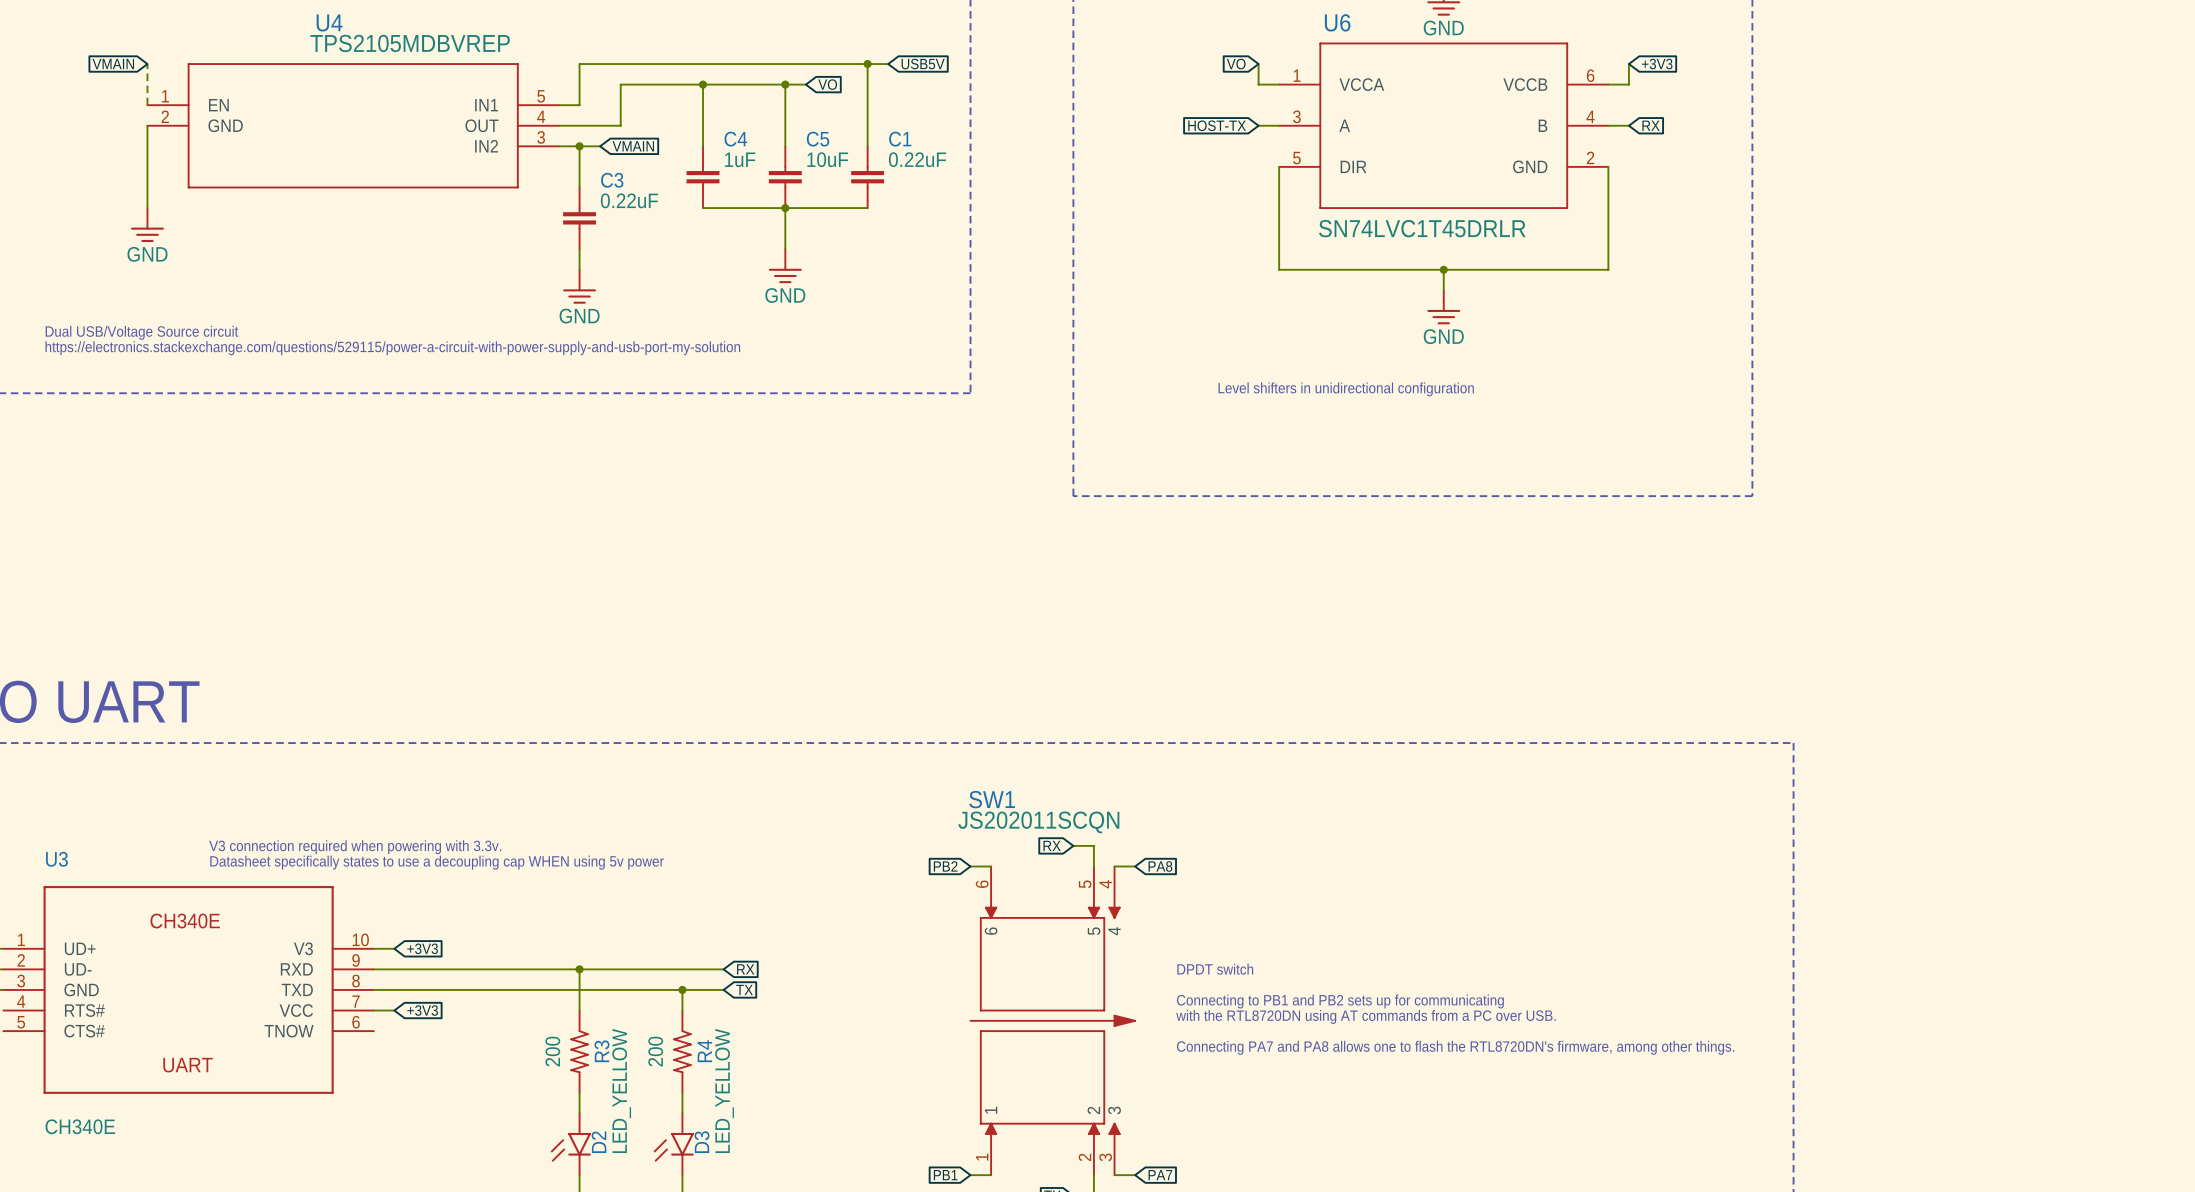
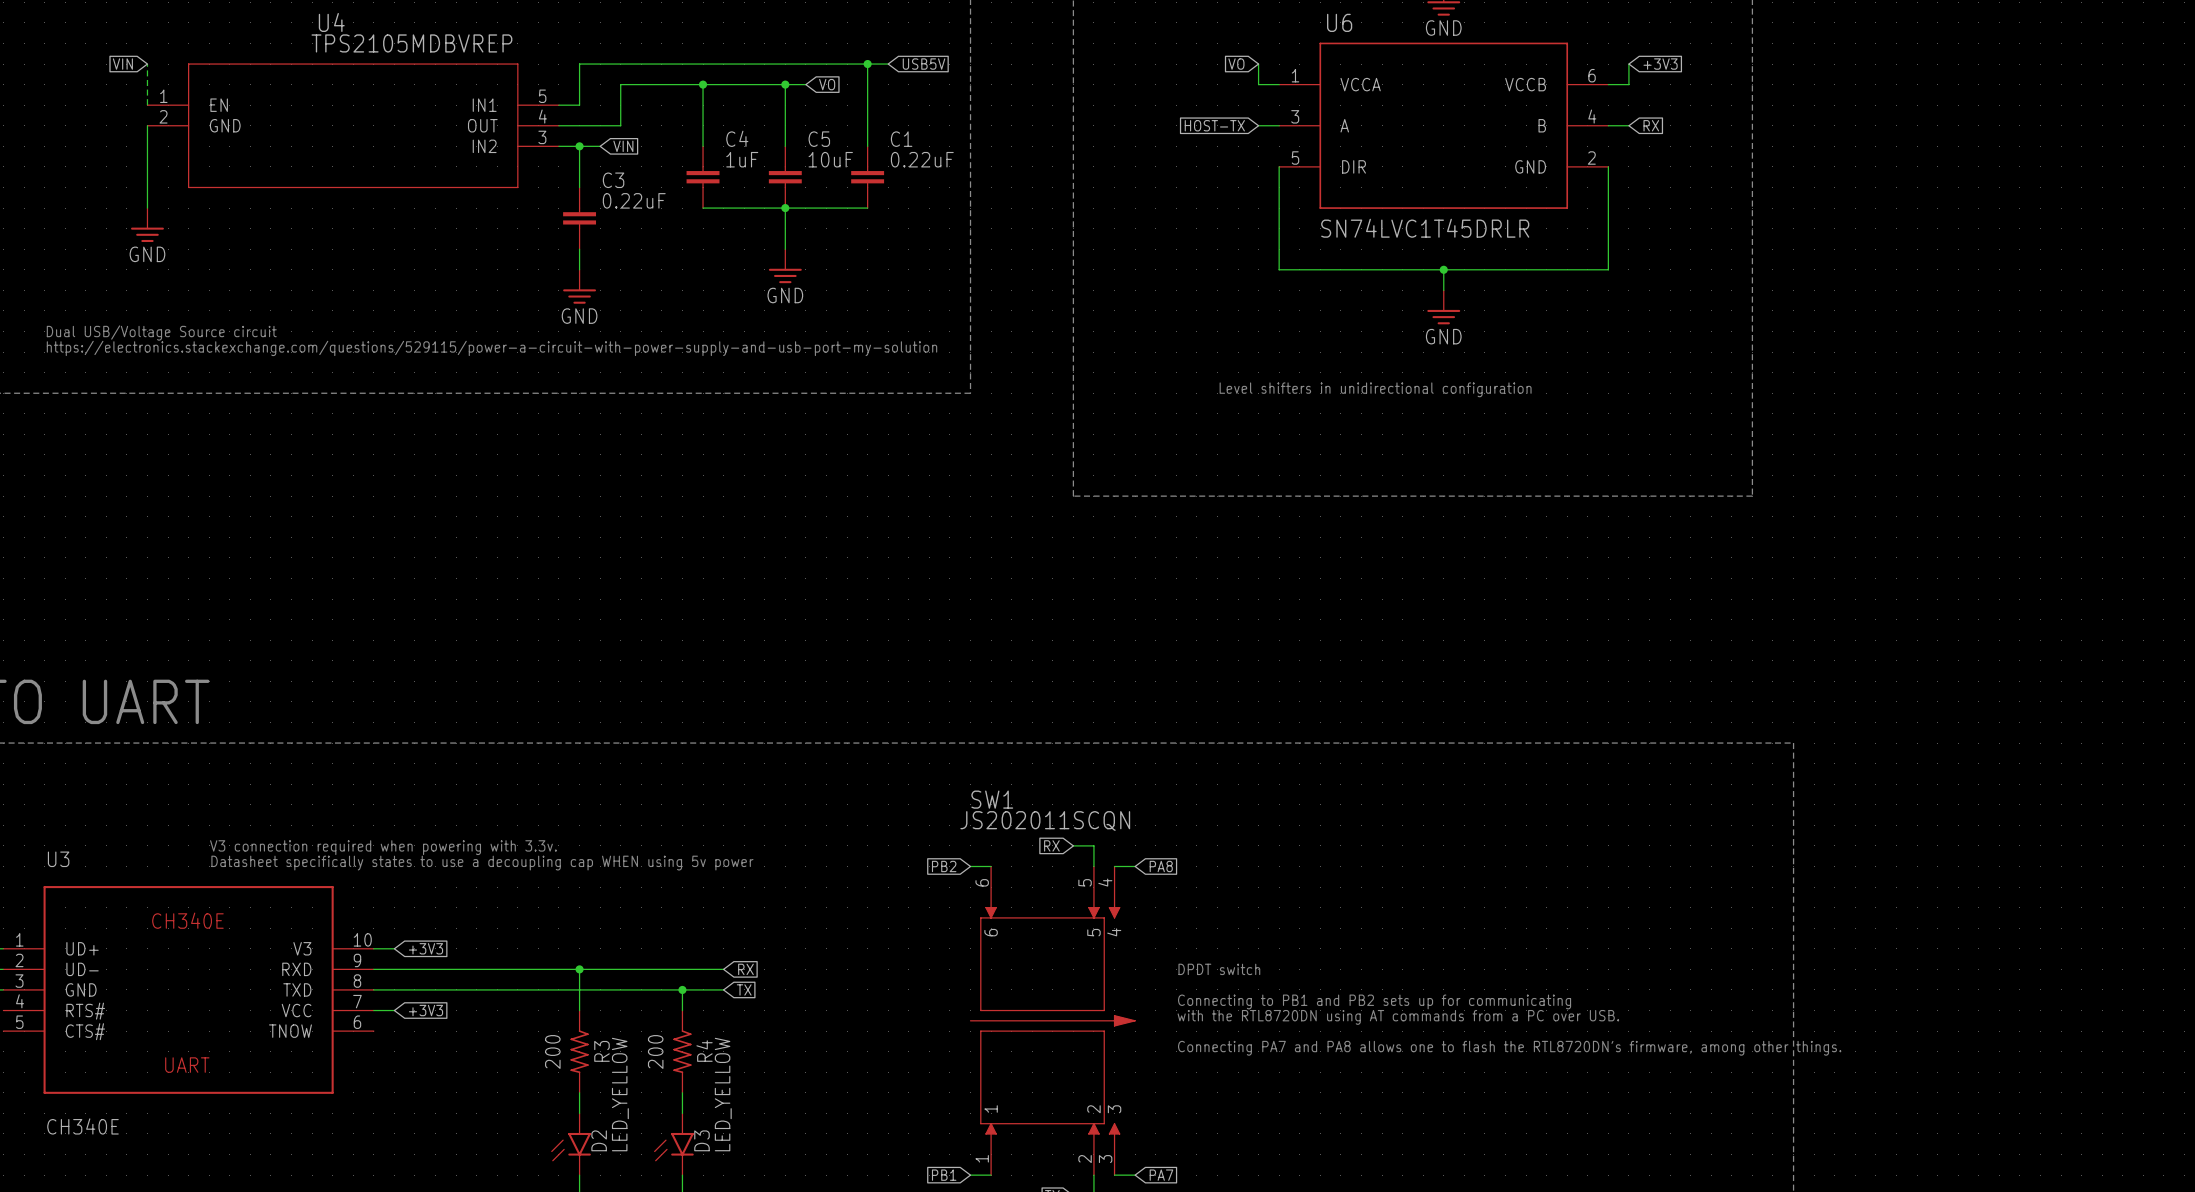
global label: VMAIN (113, 64) -> VIN (122, 64)
global label: VMAIN (633, 146) -> VIN (623, 146)

